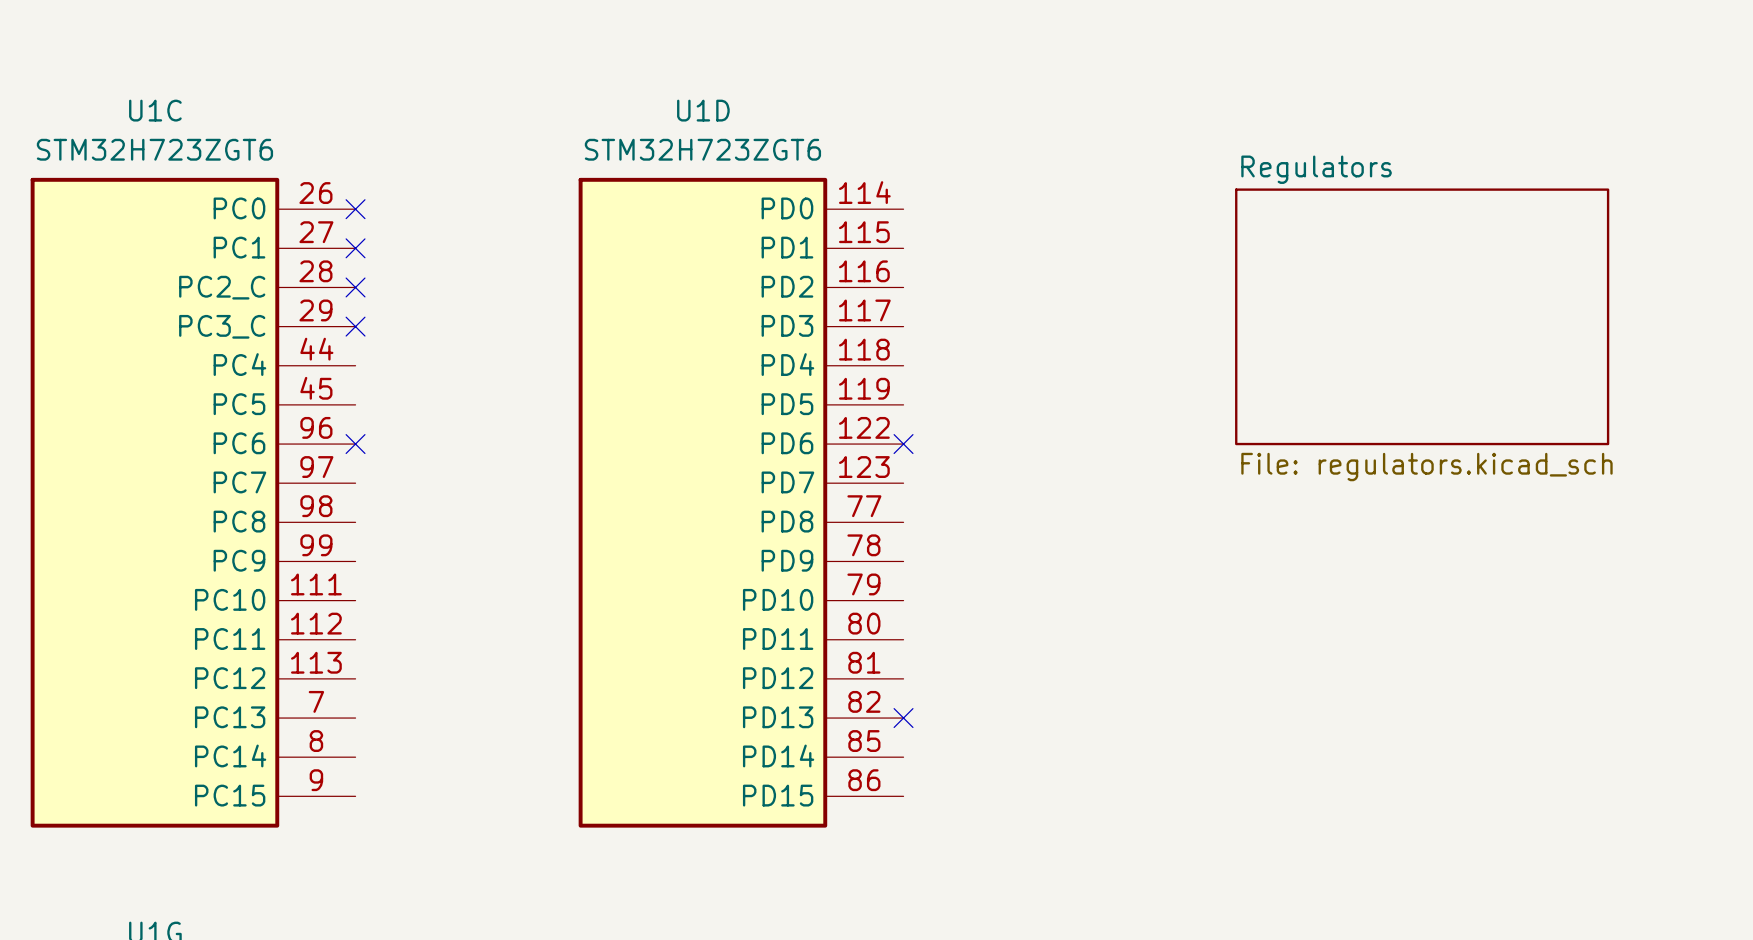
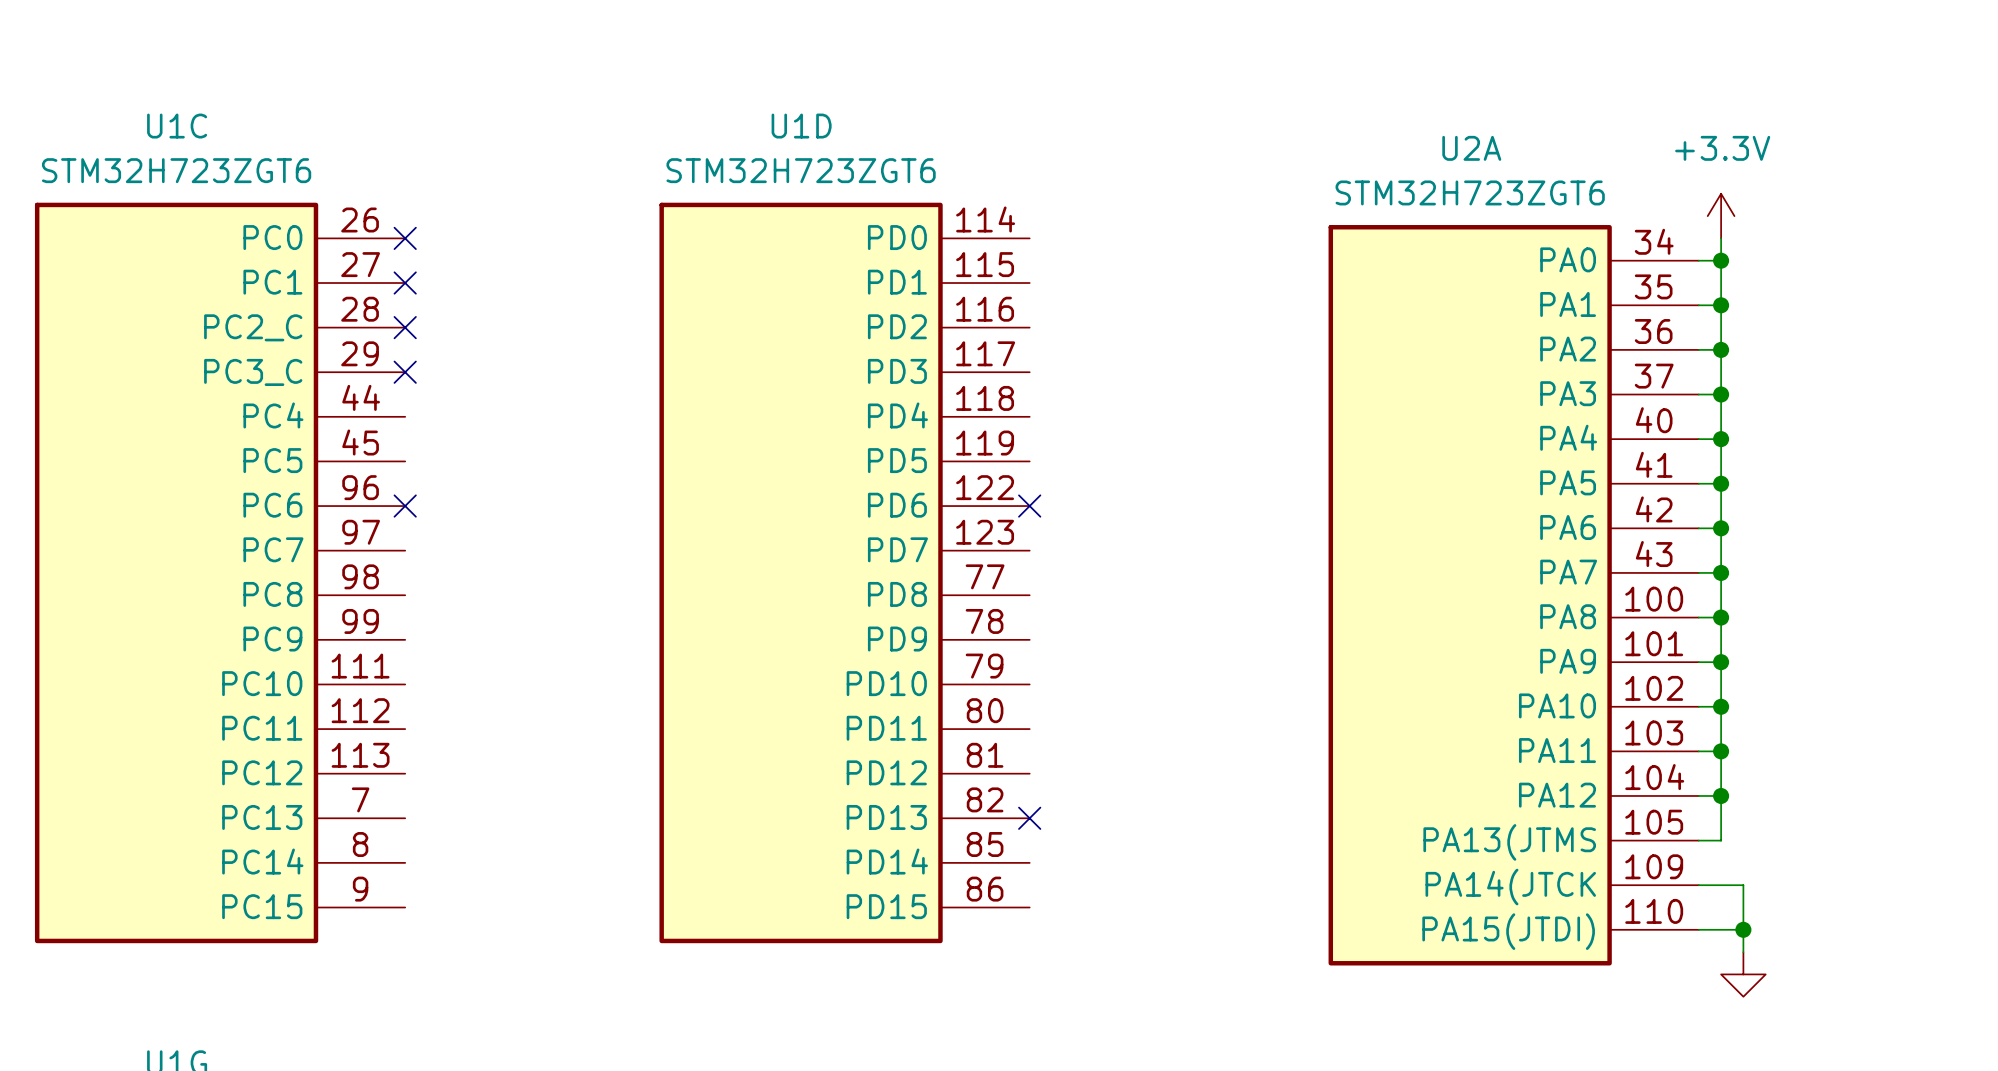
power symbol: none -> +3.3V (1721, 216)
wire: none -> (1721, 238) (1721, 840) (1698, 840)
wire: none -> (1698, 260) (1721, 260)
junction: none -> (1721, 260)
wire: none -> (1698, 305) (1721, 305)
junction: none -> (1721, 305)
wire: none -> (1698, 349) (1721, 349)
junction: none -> (1721, 349)
sheet Regulators: File: regulators.kicad_sch (1422, 316) -> none
wire: none -> (1698, 394) (1721, 394)
junction: none -> (1721, 394)
wire: none -> (1698, 439) (1721, 439)
junction: none -> (1721, 439)
wire: none -> (1698, 483) (1721, 483)
junction: none -> (1721, 483)
wire: none -> (1698, 528) (1721, 528)
junction: none -> (1721, 528)
wire: none -> (1698, 572) (1721, 572)
junction: none -> (1721, 572)
U2A: none -> STM32H723ZGT6 (1513, 595)
wire: none -> (1698, 617) (1721, 617)
junction: none -> (1721, 617)
wire: none -> (1698, 662) (1721, 662)
junction: none -> (1721, 662)
wire: none -> (1698, 706) (1721, 706)
junction: none -> (1721, 706)
wire: none -> (1698, 751) (1721, 751)
junction: none -> (1721, 751)
wire: none -> (1698, 795) (1721, 795)
junction: none -> (1721, 795)
wire: none -> (1698, 885) (1743, 885) (1743, 952)
wire: none -> (1698, 929) (1743, 929)
junction: none -> (1743, 929)
power symbol: none -> (1743, 974)

